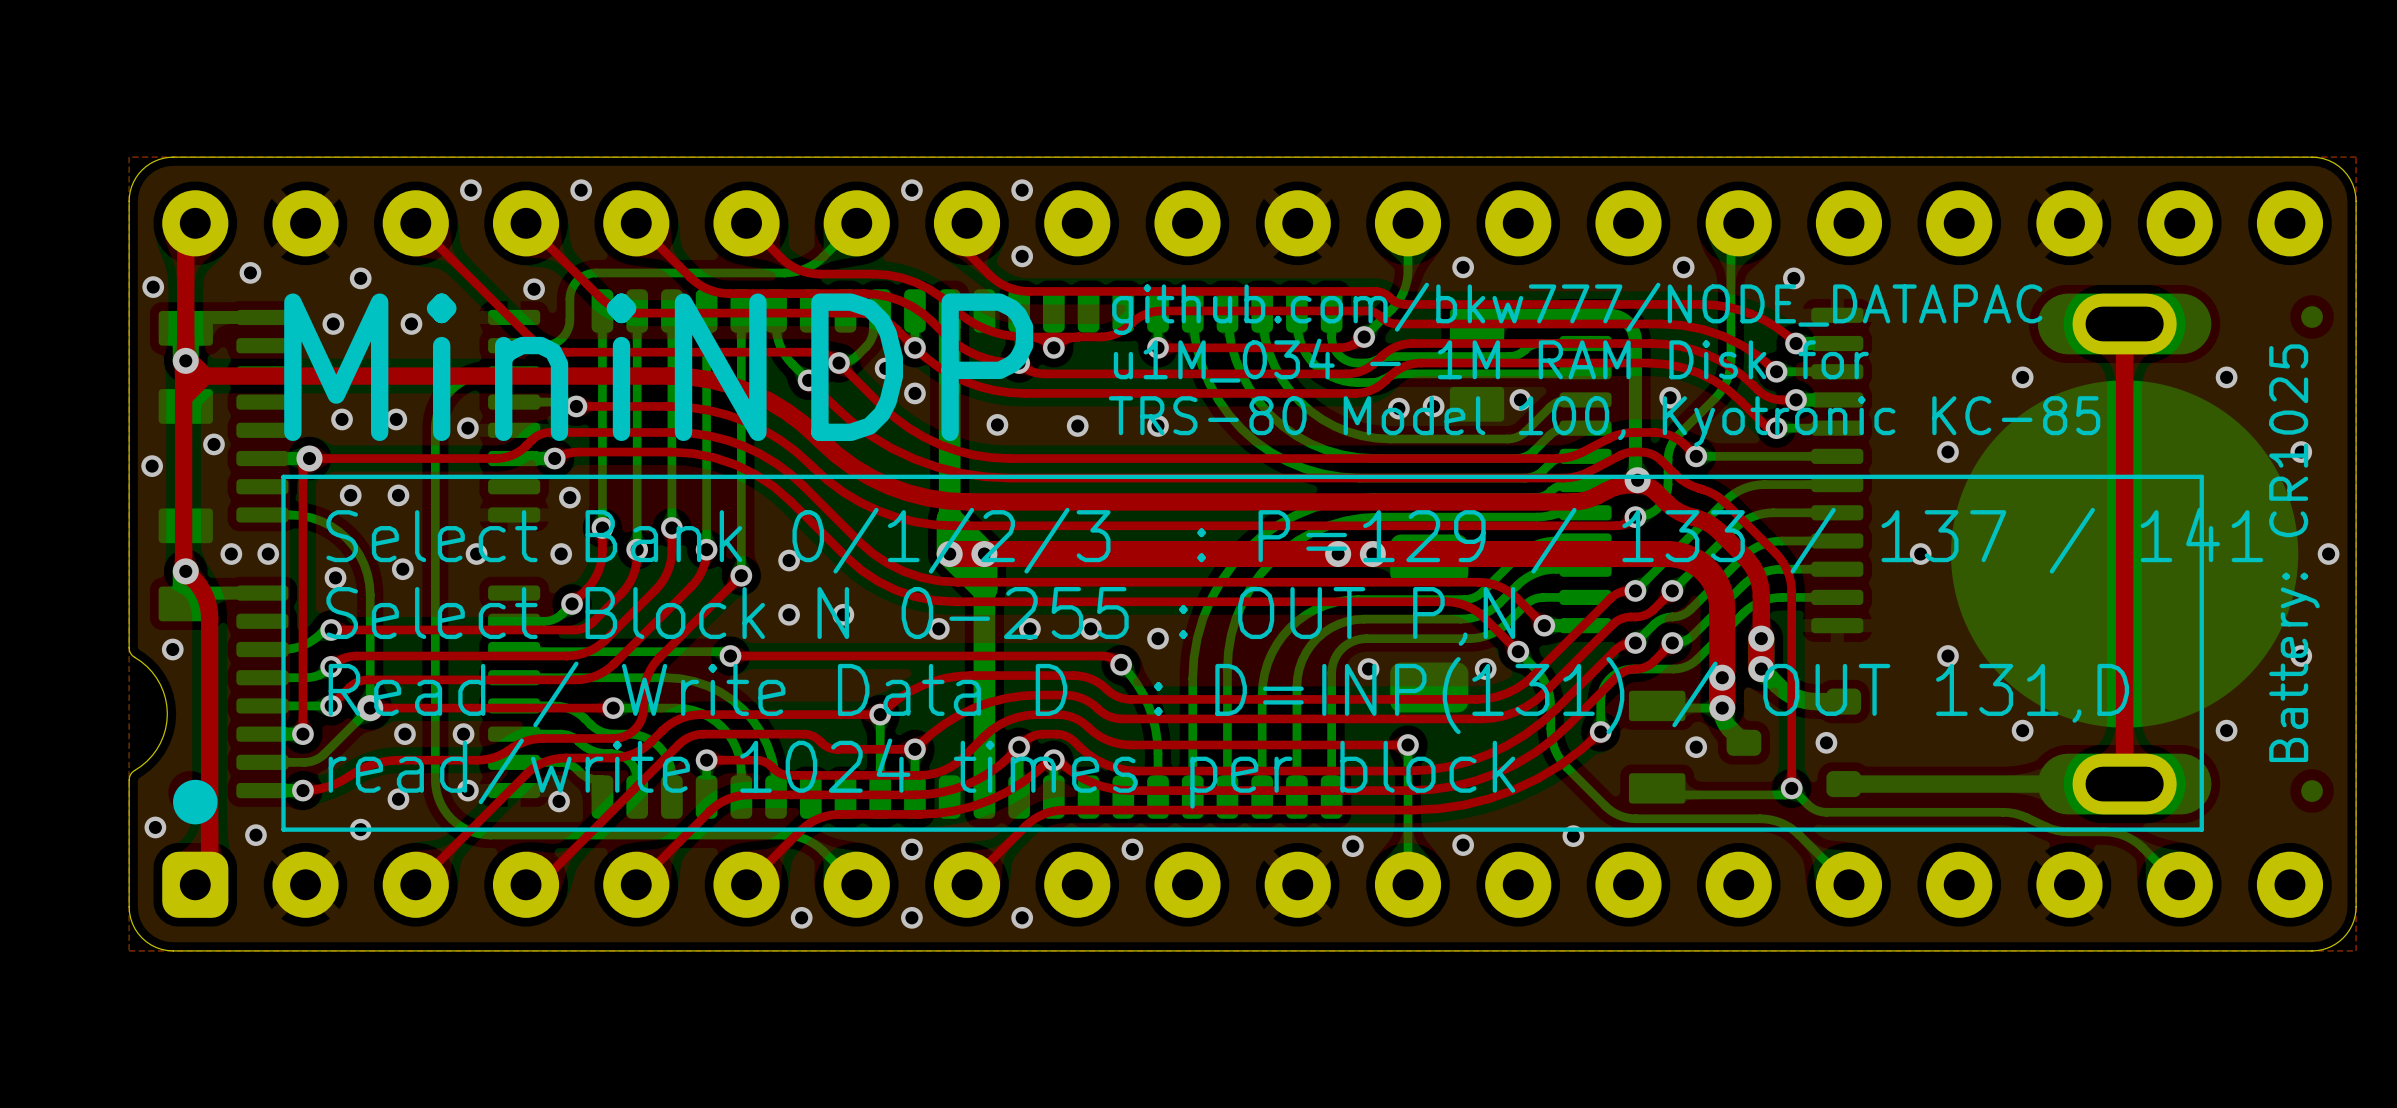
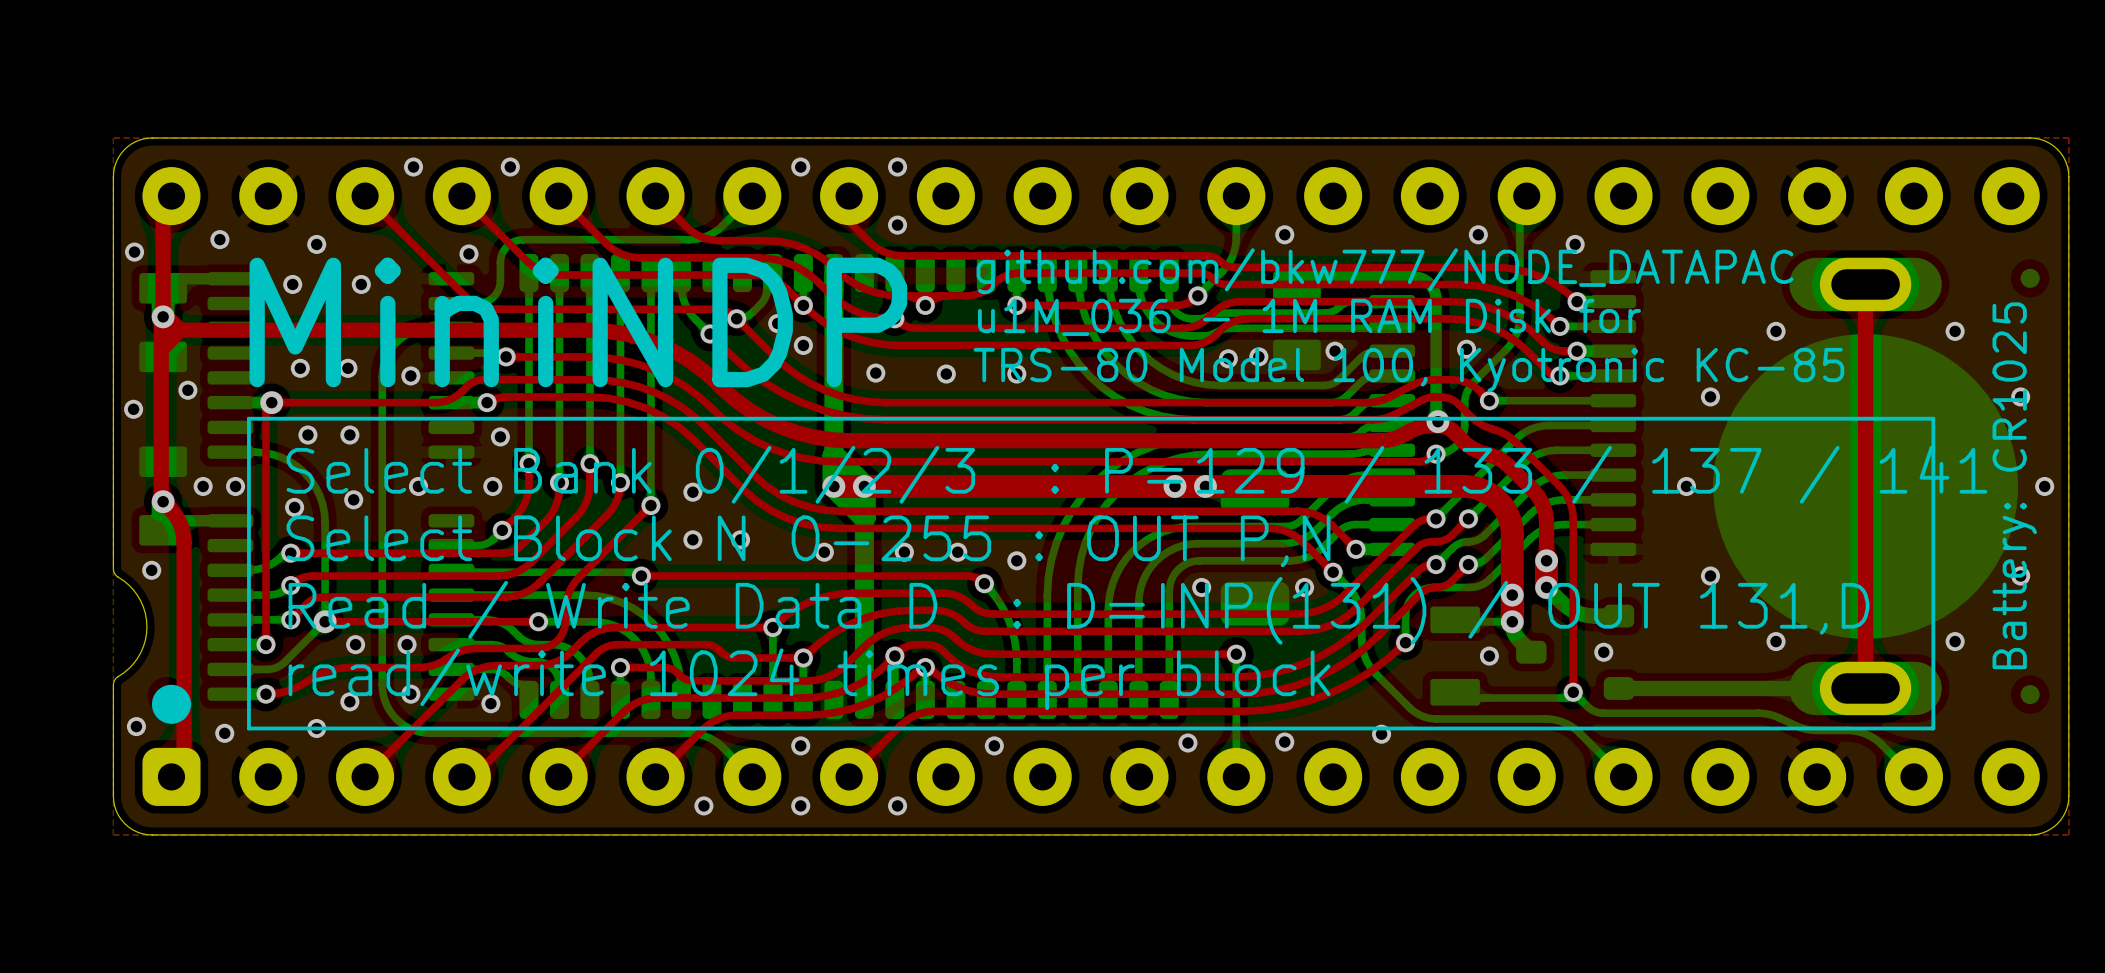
text: u1M_034 - 1M RAM Disk for (1491, 360) -> u1M_036 - 1M RAM Disk for (1309, 317)

